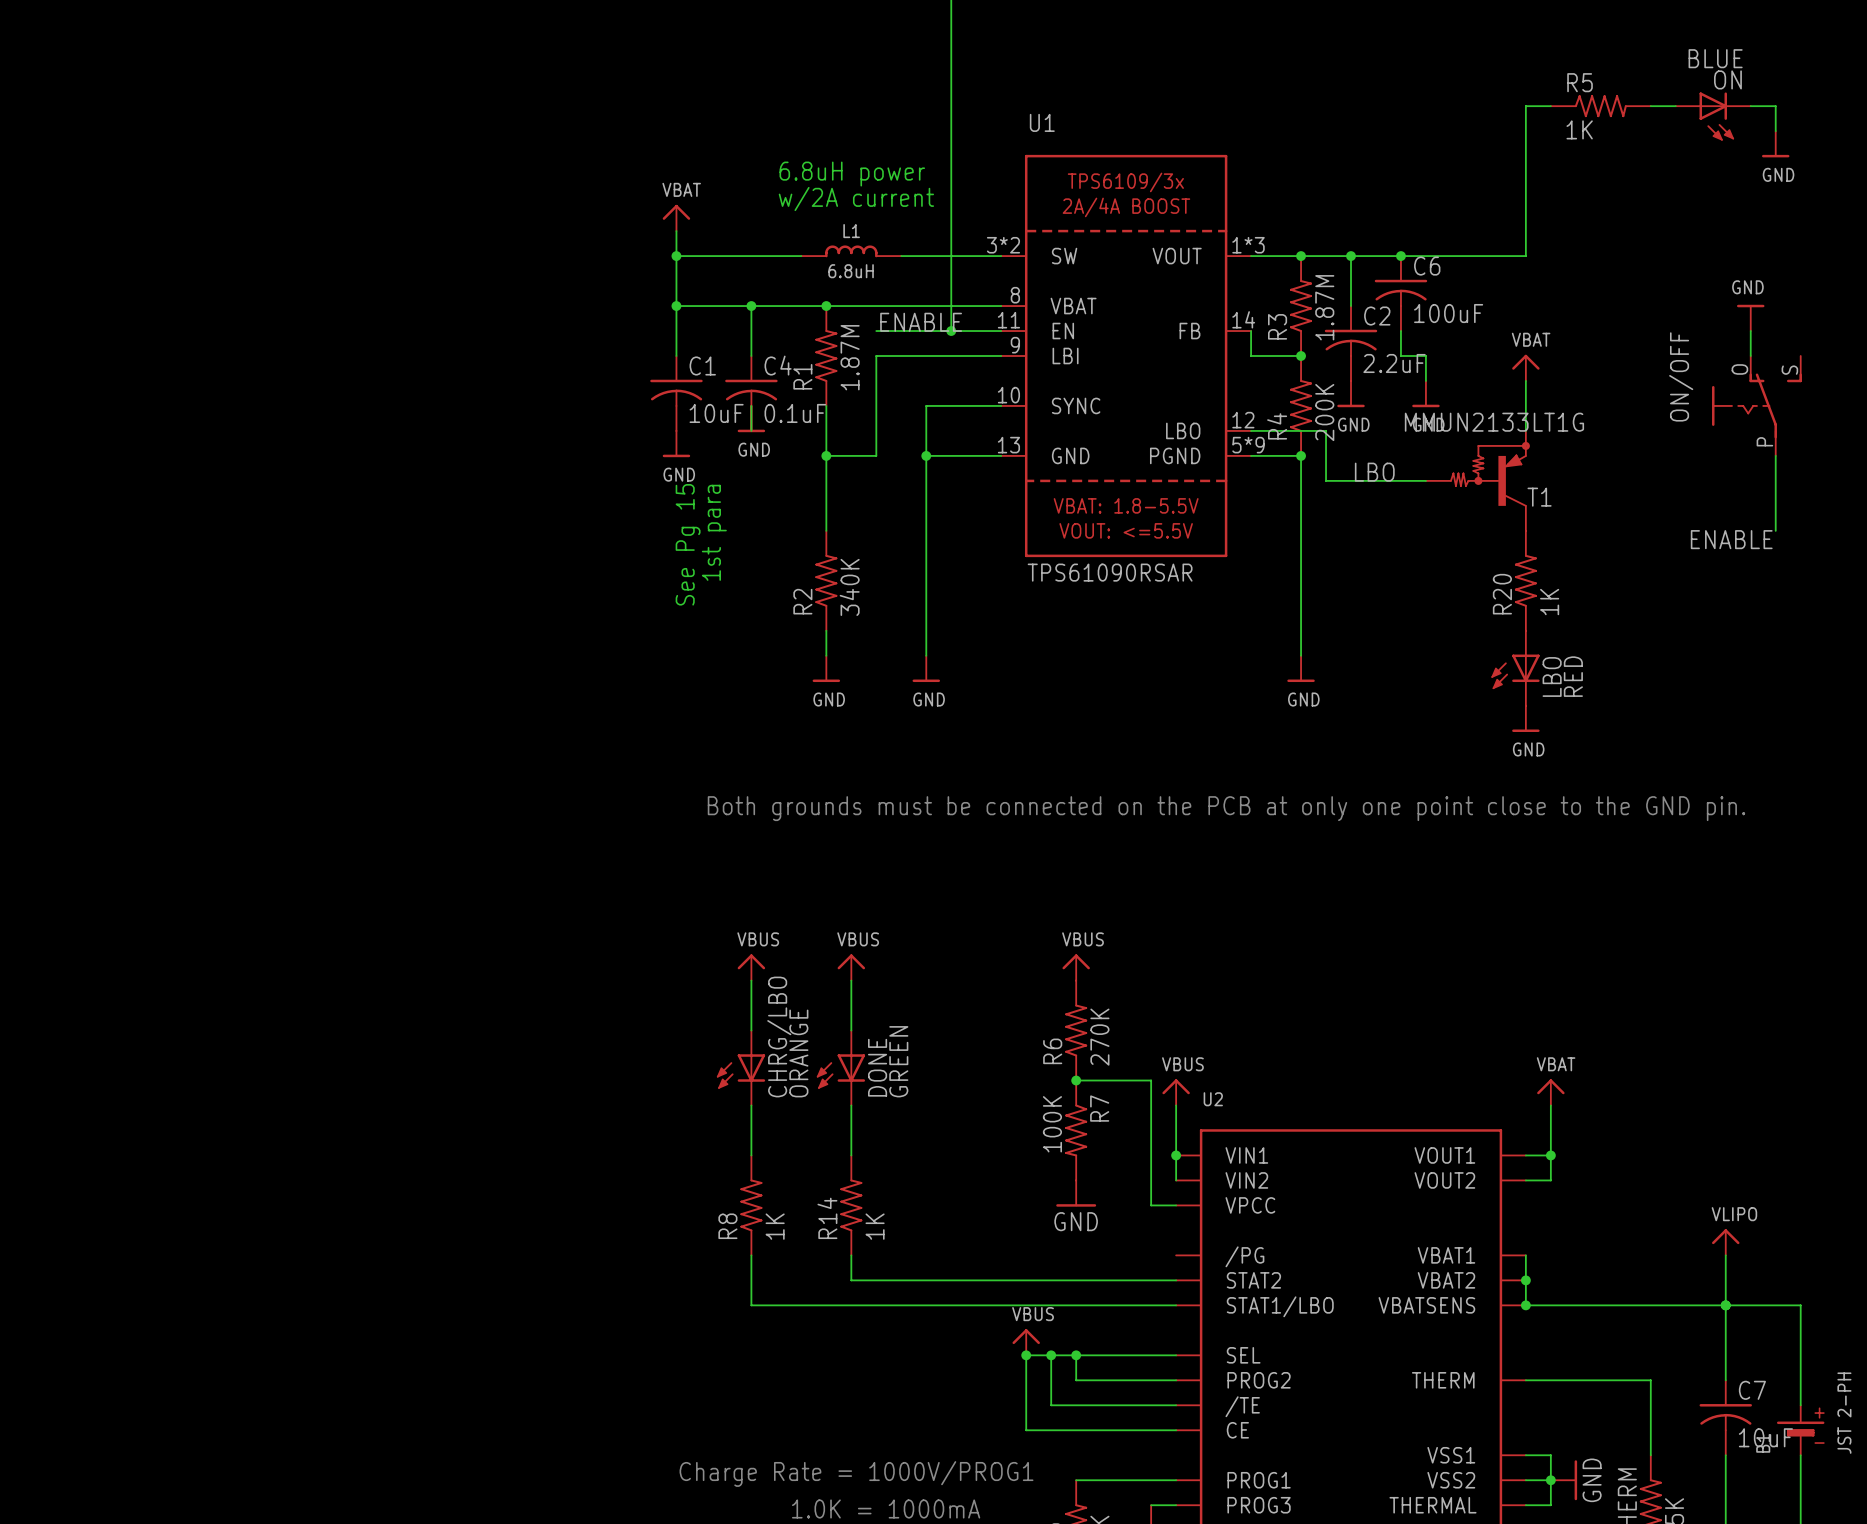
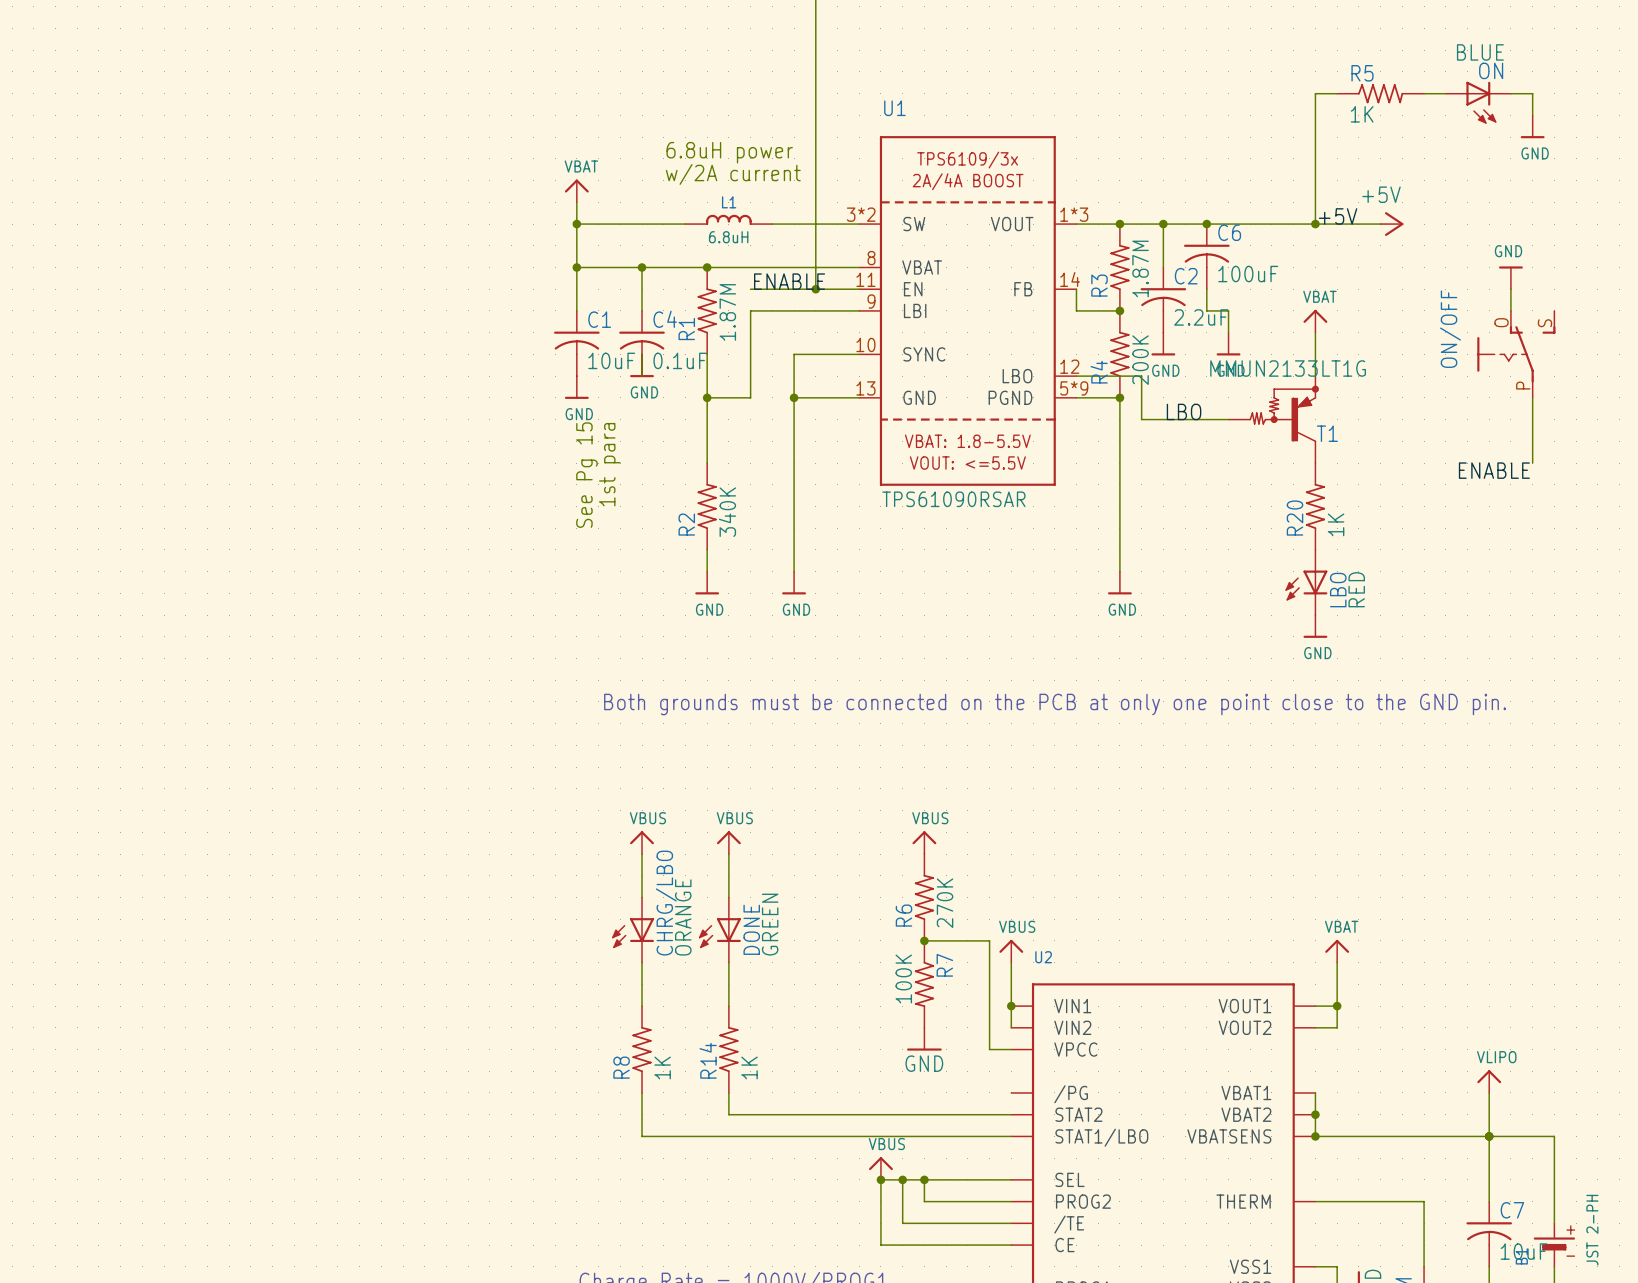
label: none -> +5V (1338, 216)
wire: none -> (1315, 224) (1380, 224)
junction: none -> (1315, 224)
power symbol: none -> +5V (1392, 224)

